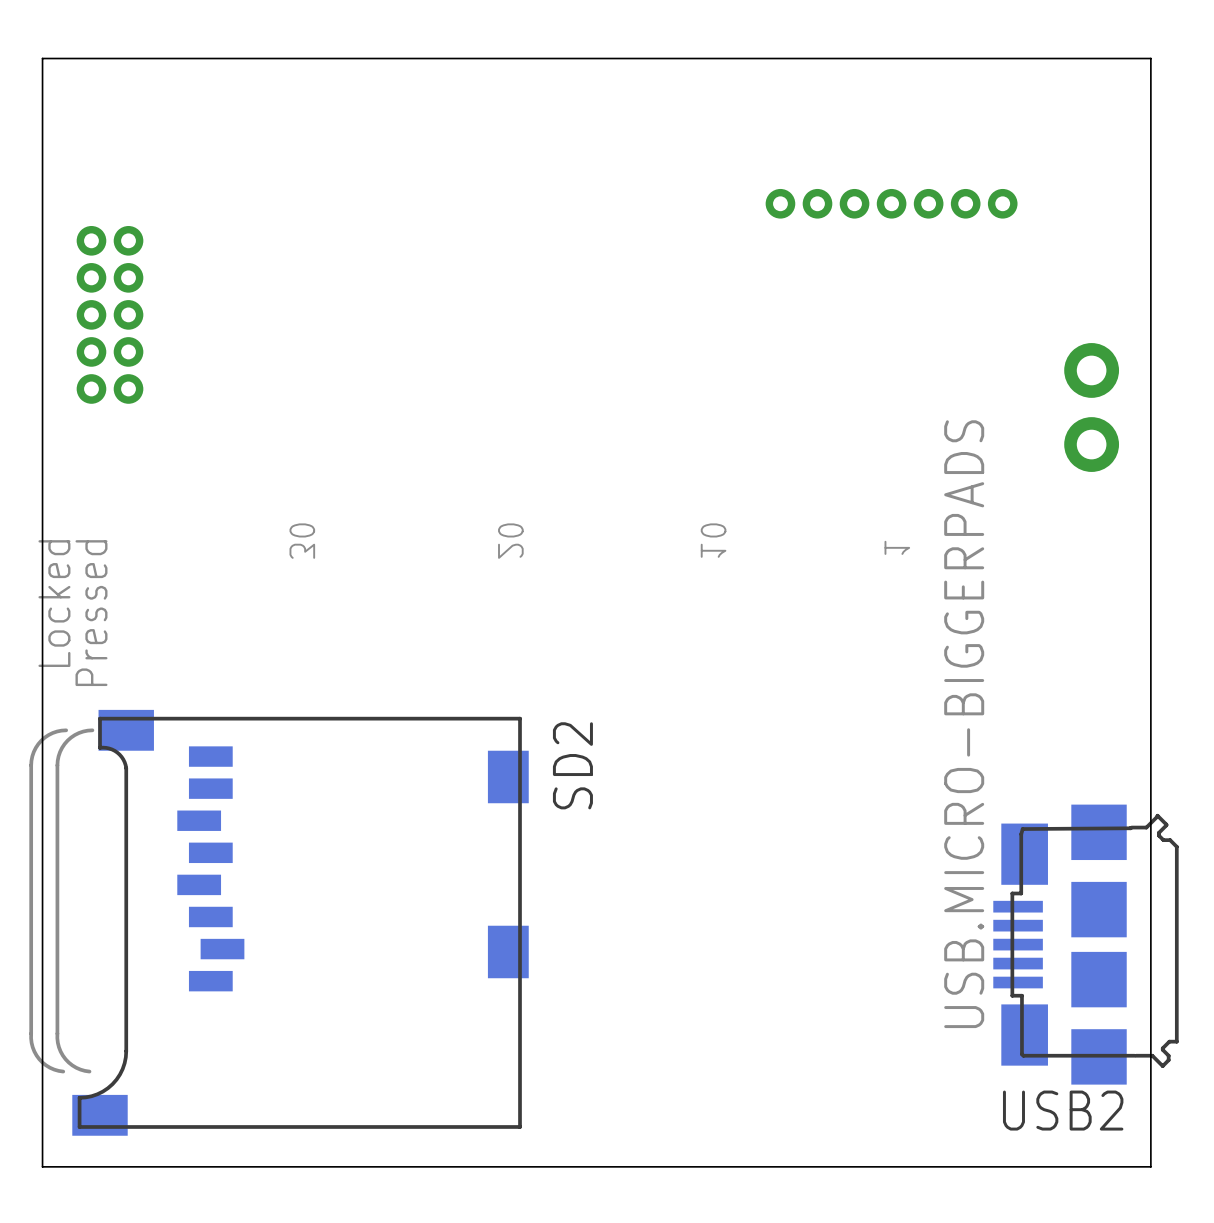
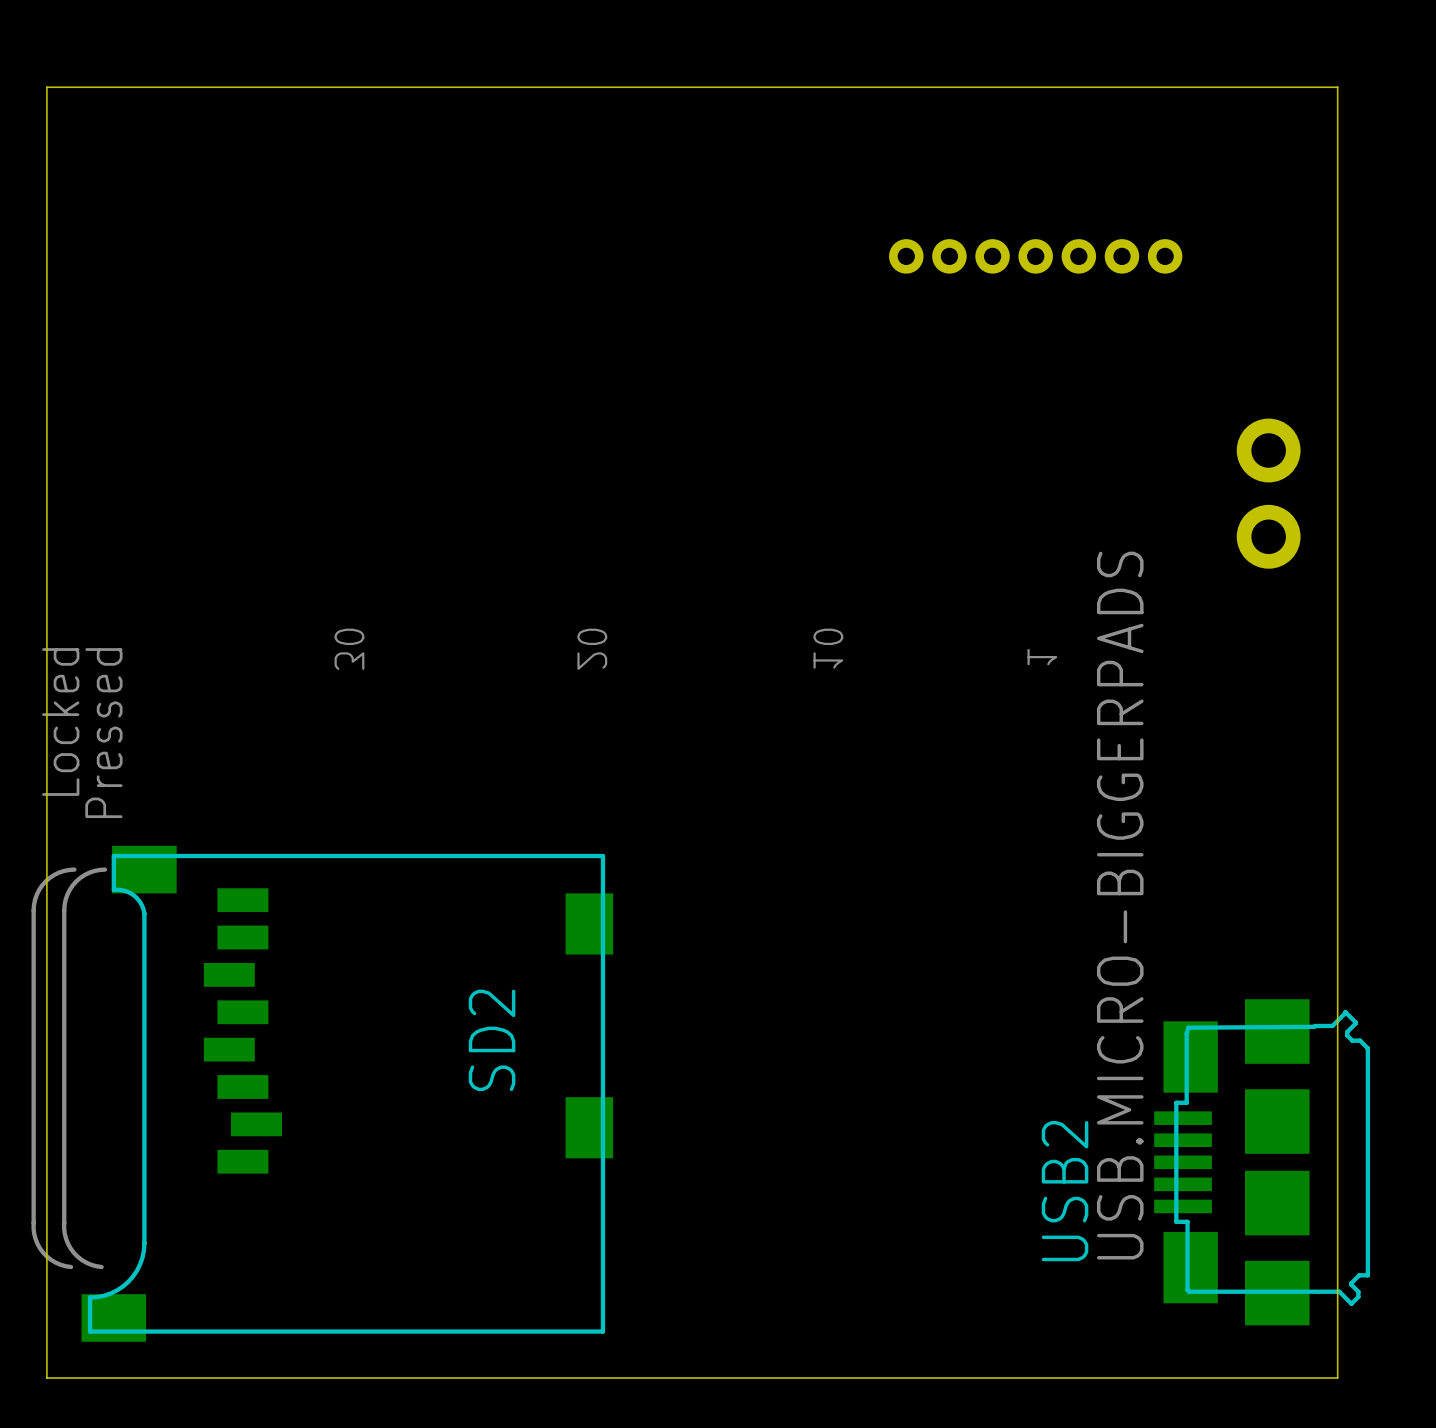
part: (110, 314) -> none
SD2 name position: SD2 (572, 765) -> SD2 (492, 1040)
USB2 position: (1085, 944) -> (1262, 1162)
USB2 name rotation: 0° (1063, 1110) -> 90° counterclockwise (1065, 1191)
USB2 name position: USB2 (1063, 1110) -> USB2 (1065, 1191)

